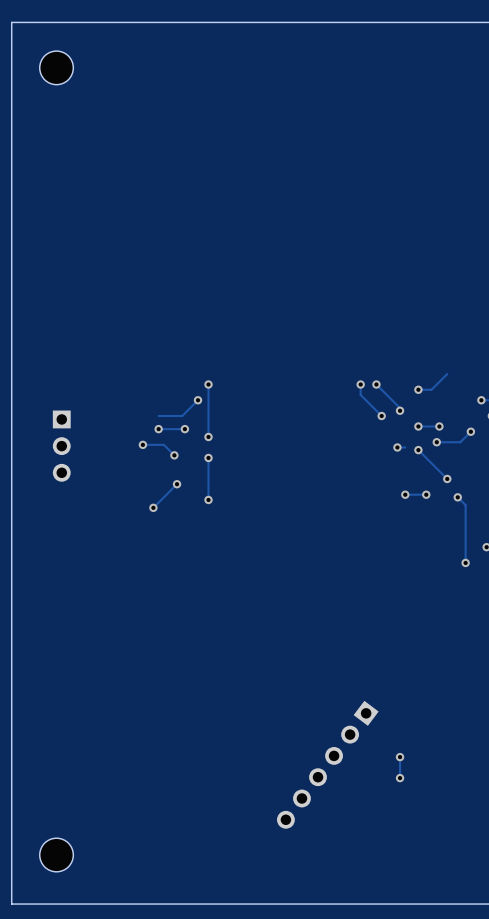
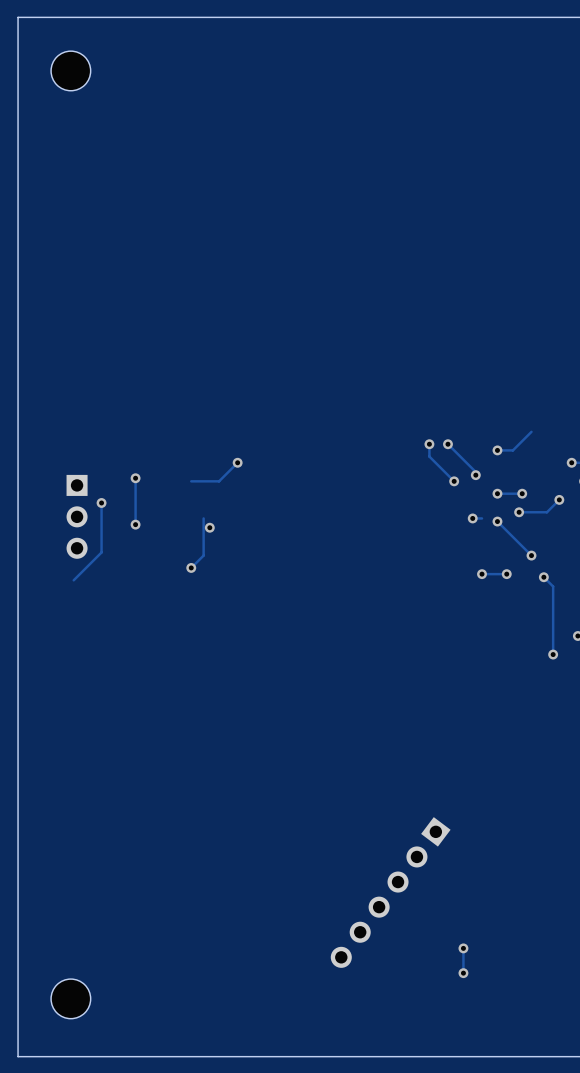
track: (208, 384) (208, 436) -> none
via: (208, 384) -> none
track: none -> (135, 478) (135, 524)
via: none -> (135, 478)
via: (158, 429) -> none
track: (184, 429) (158, 429) -> none
via: (184, 429) -> none
track: none -> (101, 502) (101, 552) (73, 580)
via: none -> (101, 502)
via: (208, 436) -> none
track: (142, 444) (163, 444) (174, 455) -> none
via: (142, 444) -> none
track: none -> (203, 518) (203, 555) (191, 567)
via: none -> (135, 524)
track: (208, 457) (208, 499) -> none
via: (208, 457) -> none
track: (177, 484) (153, 507) -> none
via: (177, 484) -> none
via: none -> (191, 567)
via: (208, 499) -> none
via: (153, 507) -> none
track: (400, 757) (400, 778) -> (463, 948) (463, 973)
via: (400, 757) -> none
via: (400, 778) -> none
via: none -> (463, 948)
via: none -> (463, 973)

